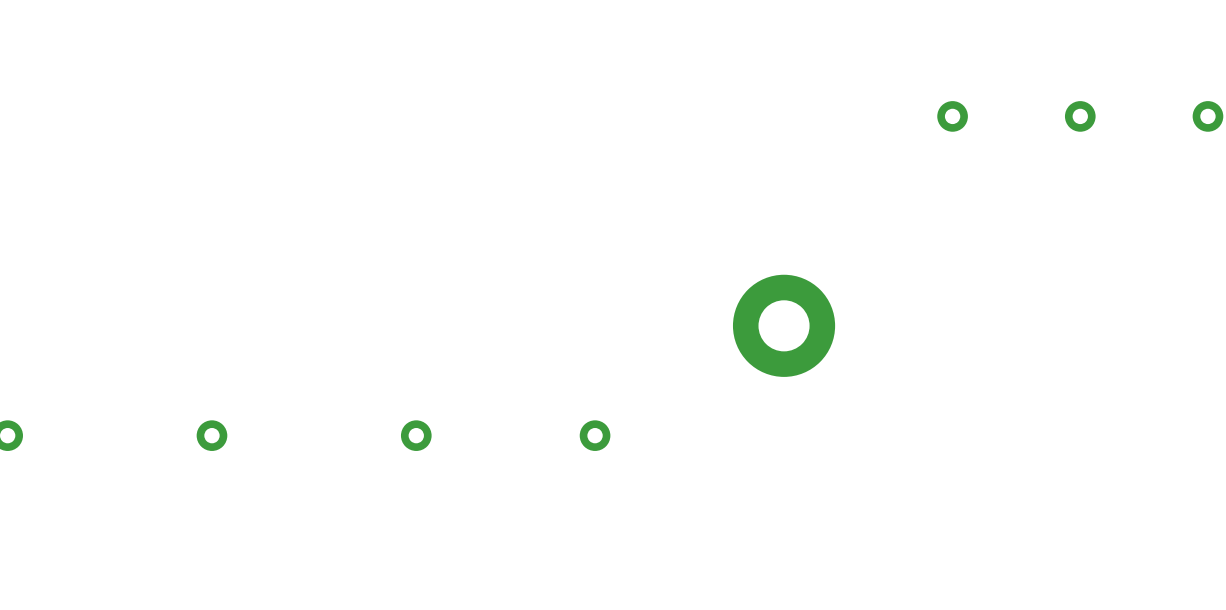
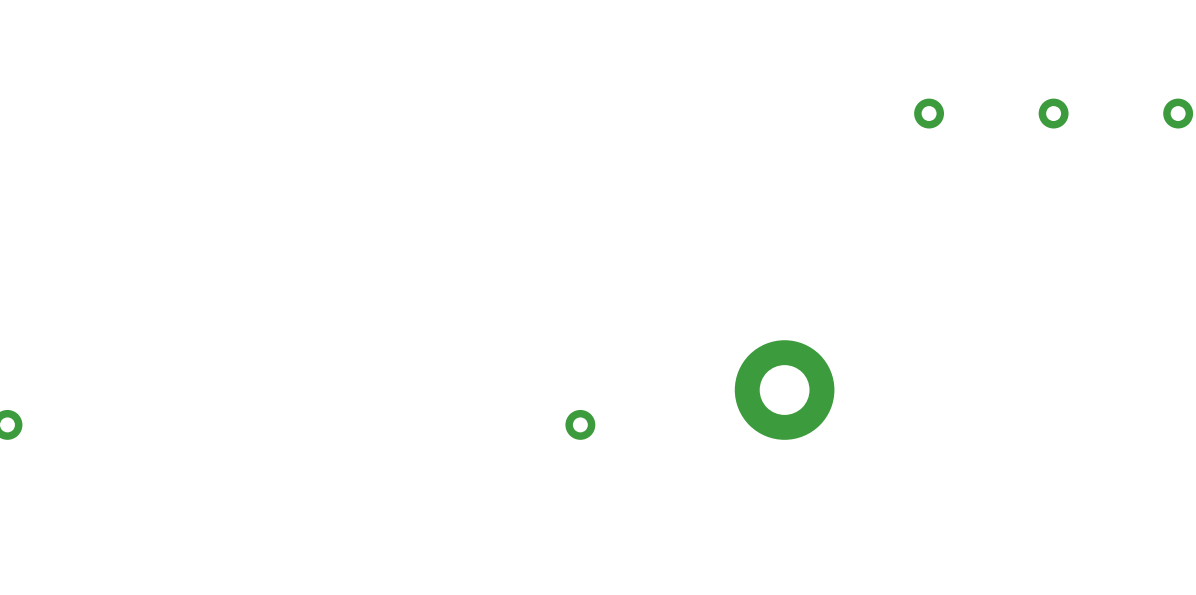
part position: (784, 325) -> (784, 390)
via: (211, 435) -> none
via: (416, 435) -> none

